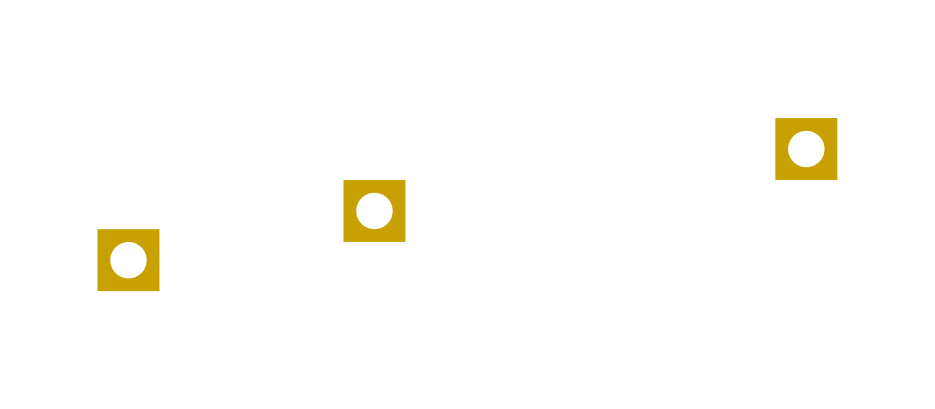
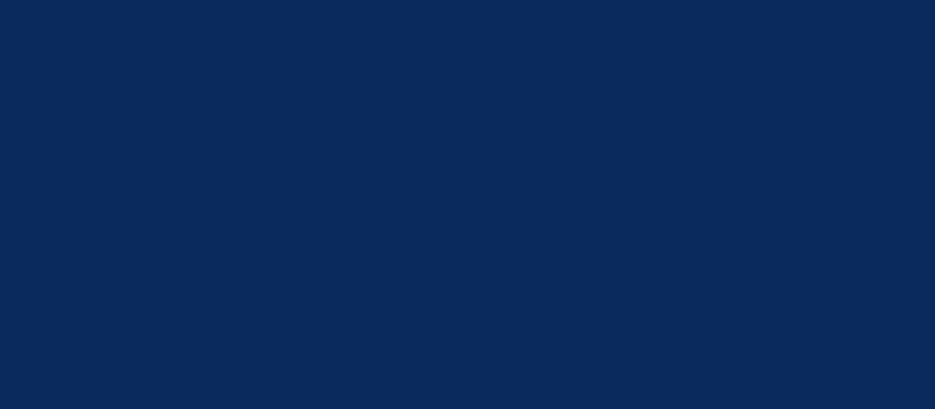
part: (806, 149) -> none
part: (374, 210) -> none
part: (128, 260) -> none

